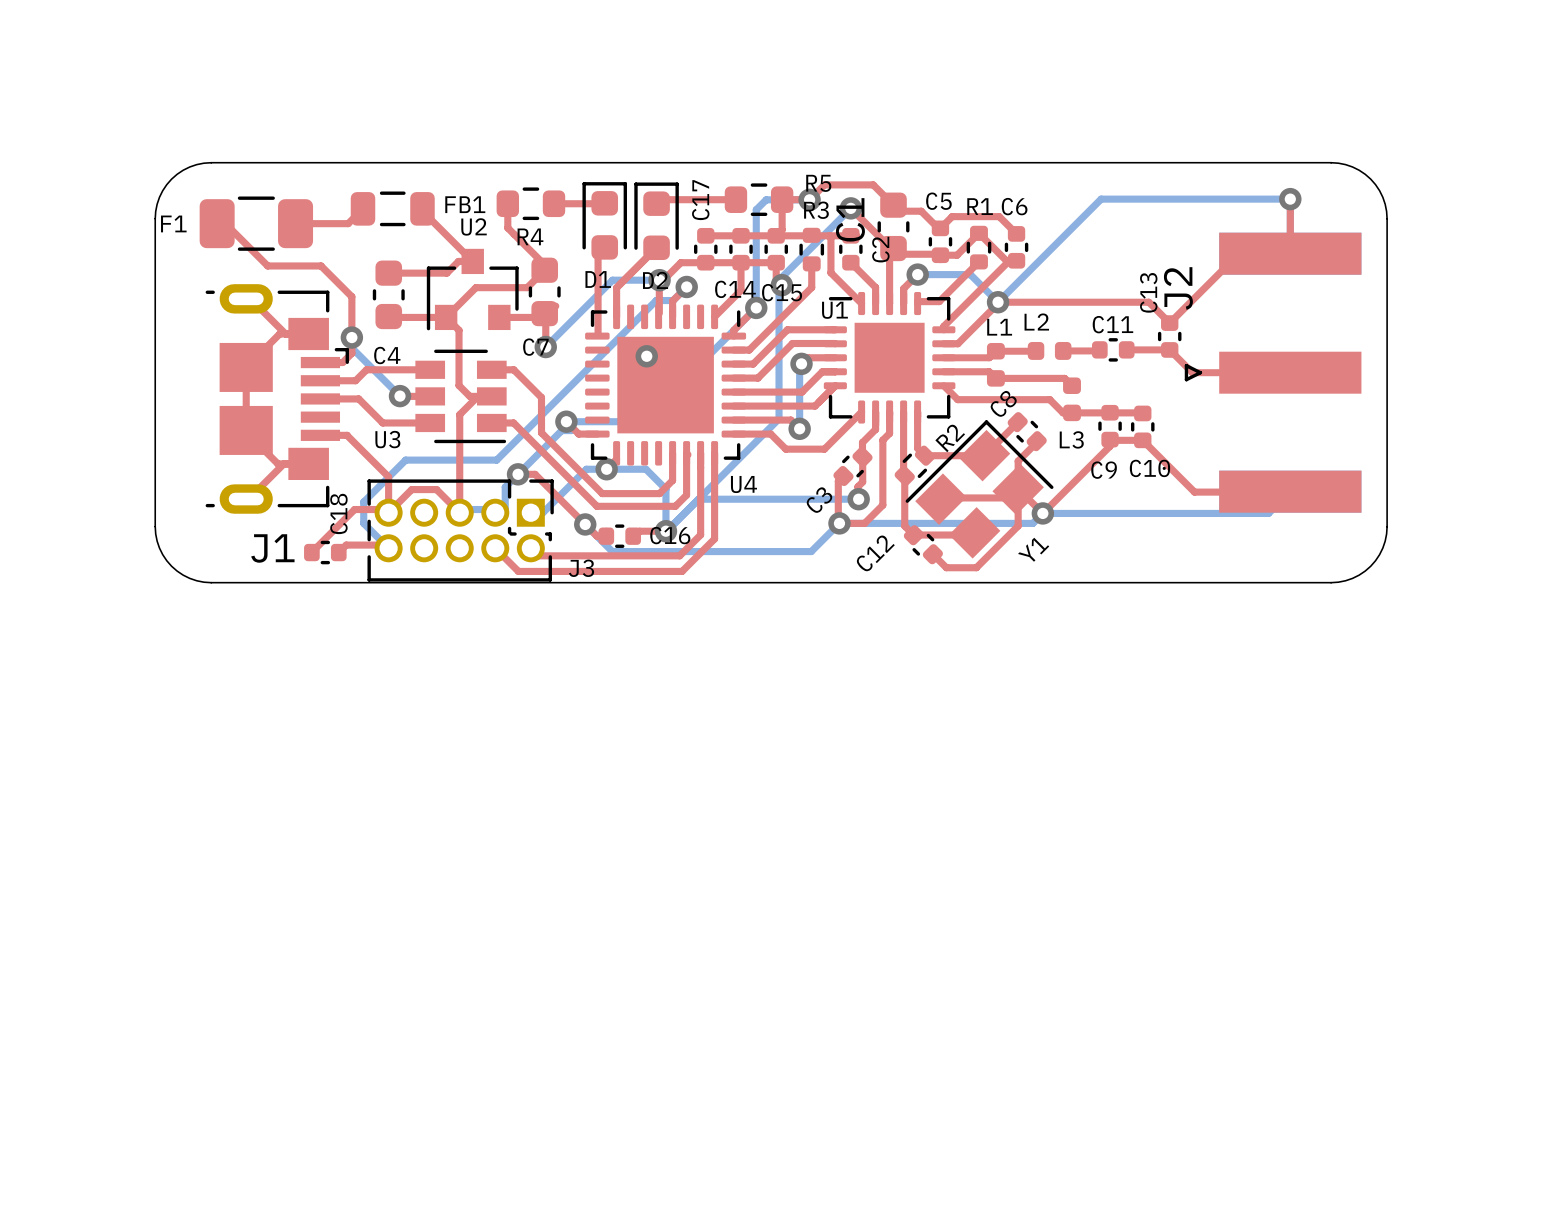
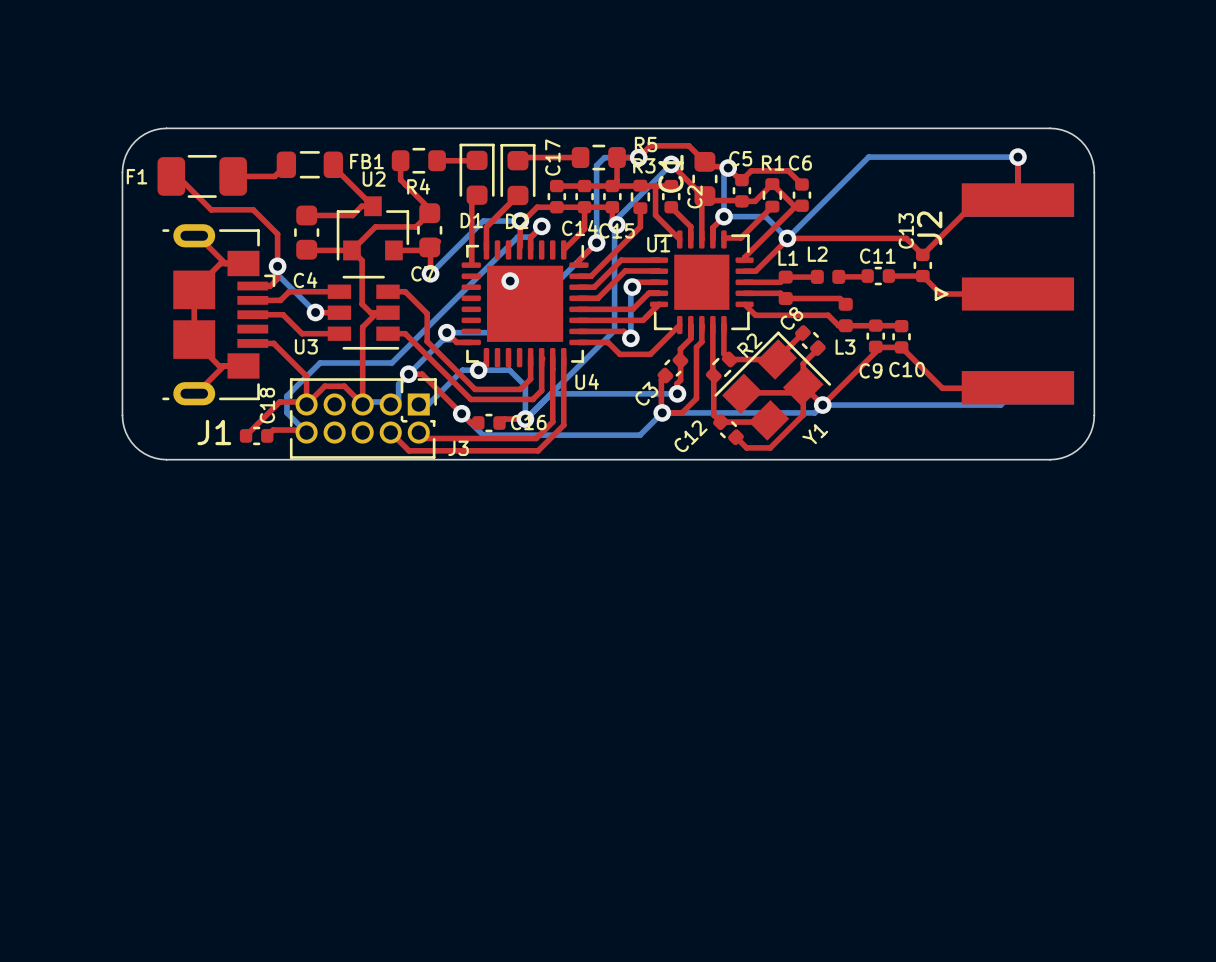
bottom track: none -> (728, 168) (723, 172) (723, 216)
via: none -> (728, 168)

